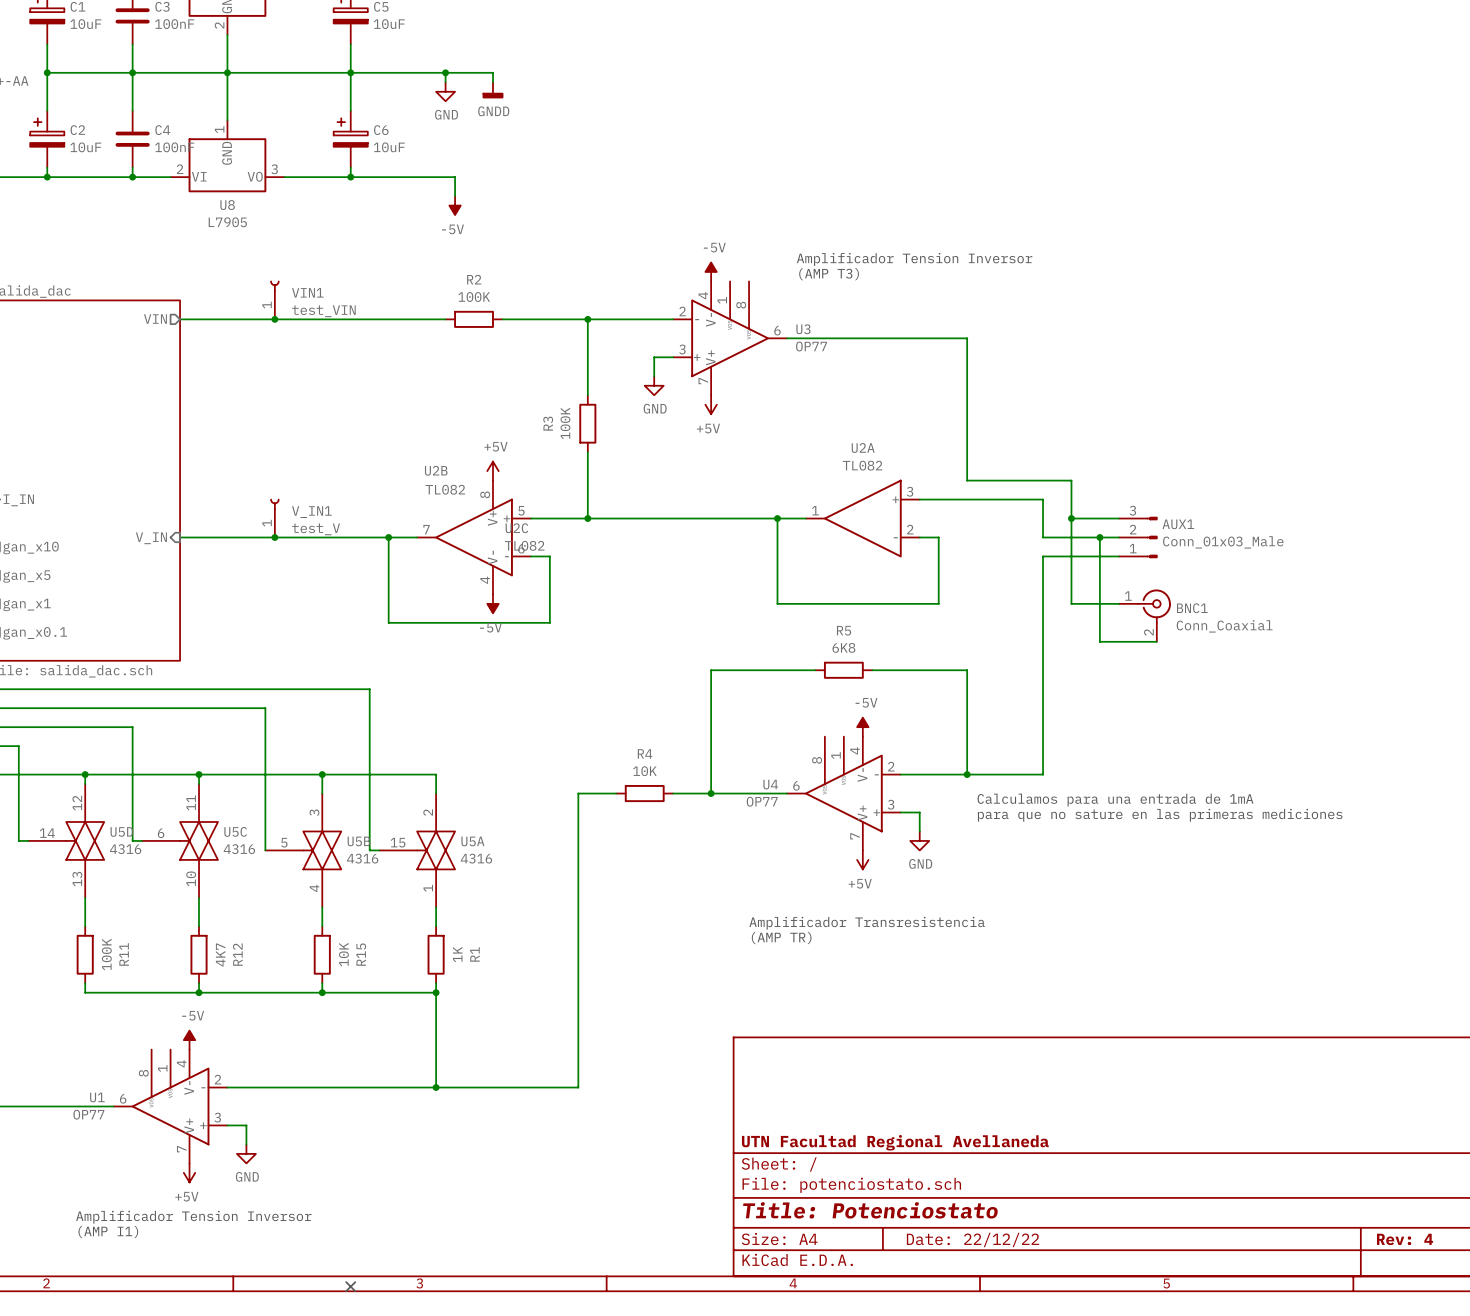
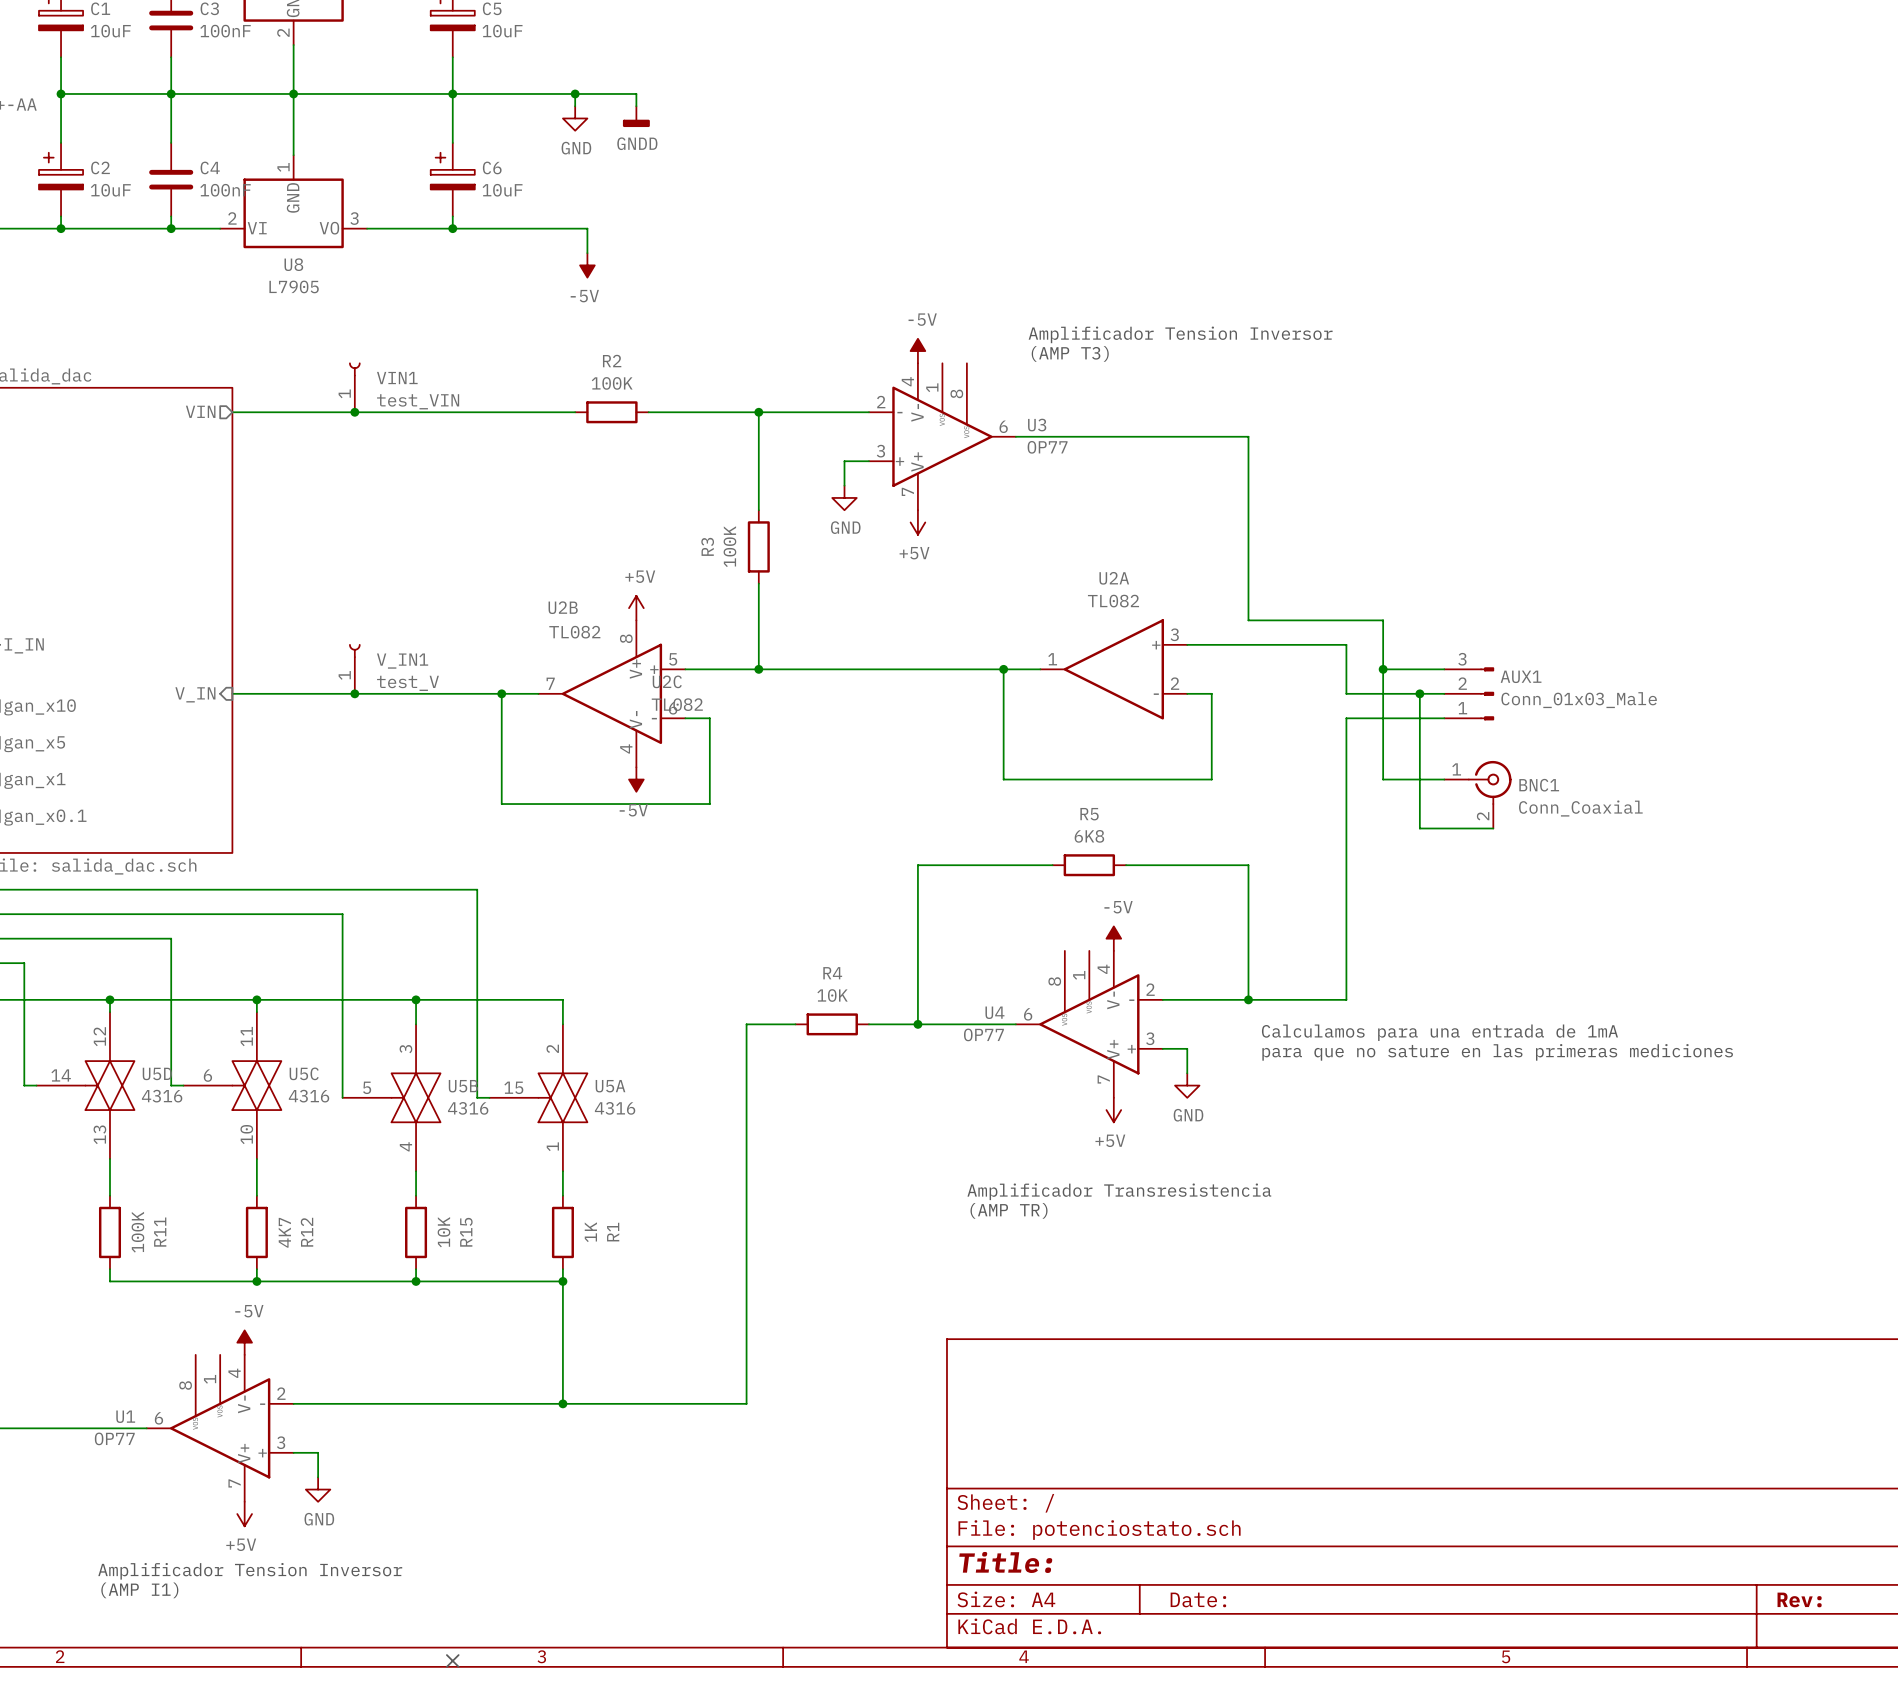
title block: UTN Facultad Regional Avellaneda (895, 1142) -> none
title block: Title: Potenciostato (870, 1210) -> Title: (1005, 1562)
title block: Date: 22/12/22 (973, 1239) -> Date: (1198, 1599)
title block: Rev: 4 (1405, 1239) -> Rev: (1799, 1599)

